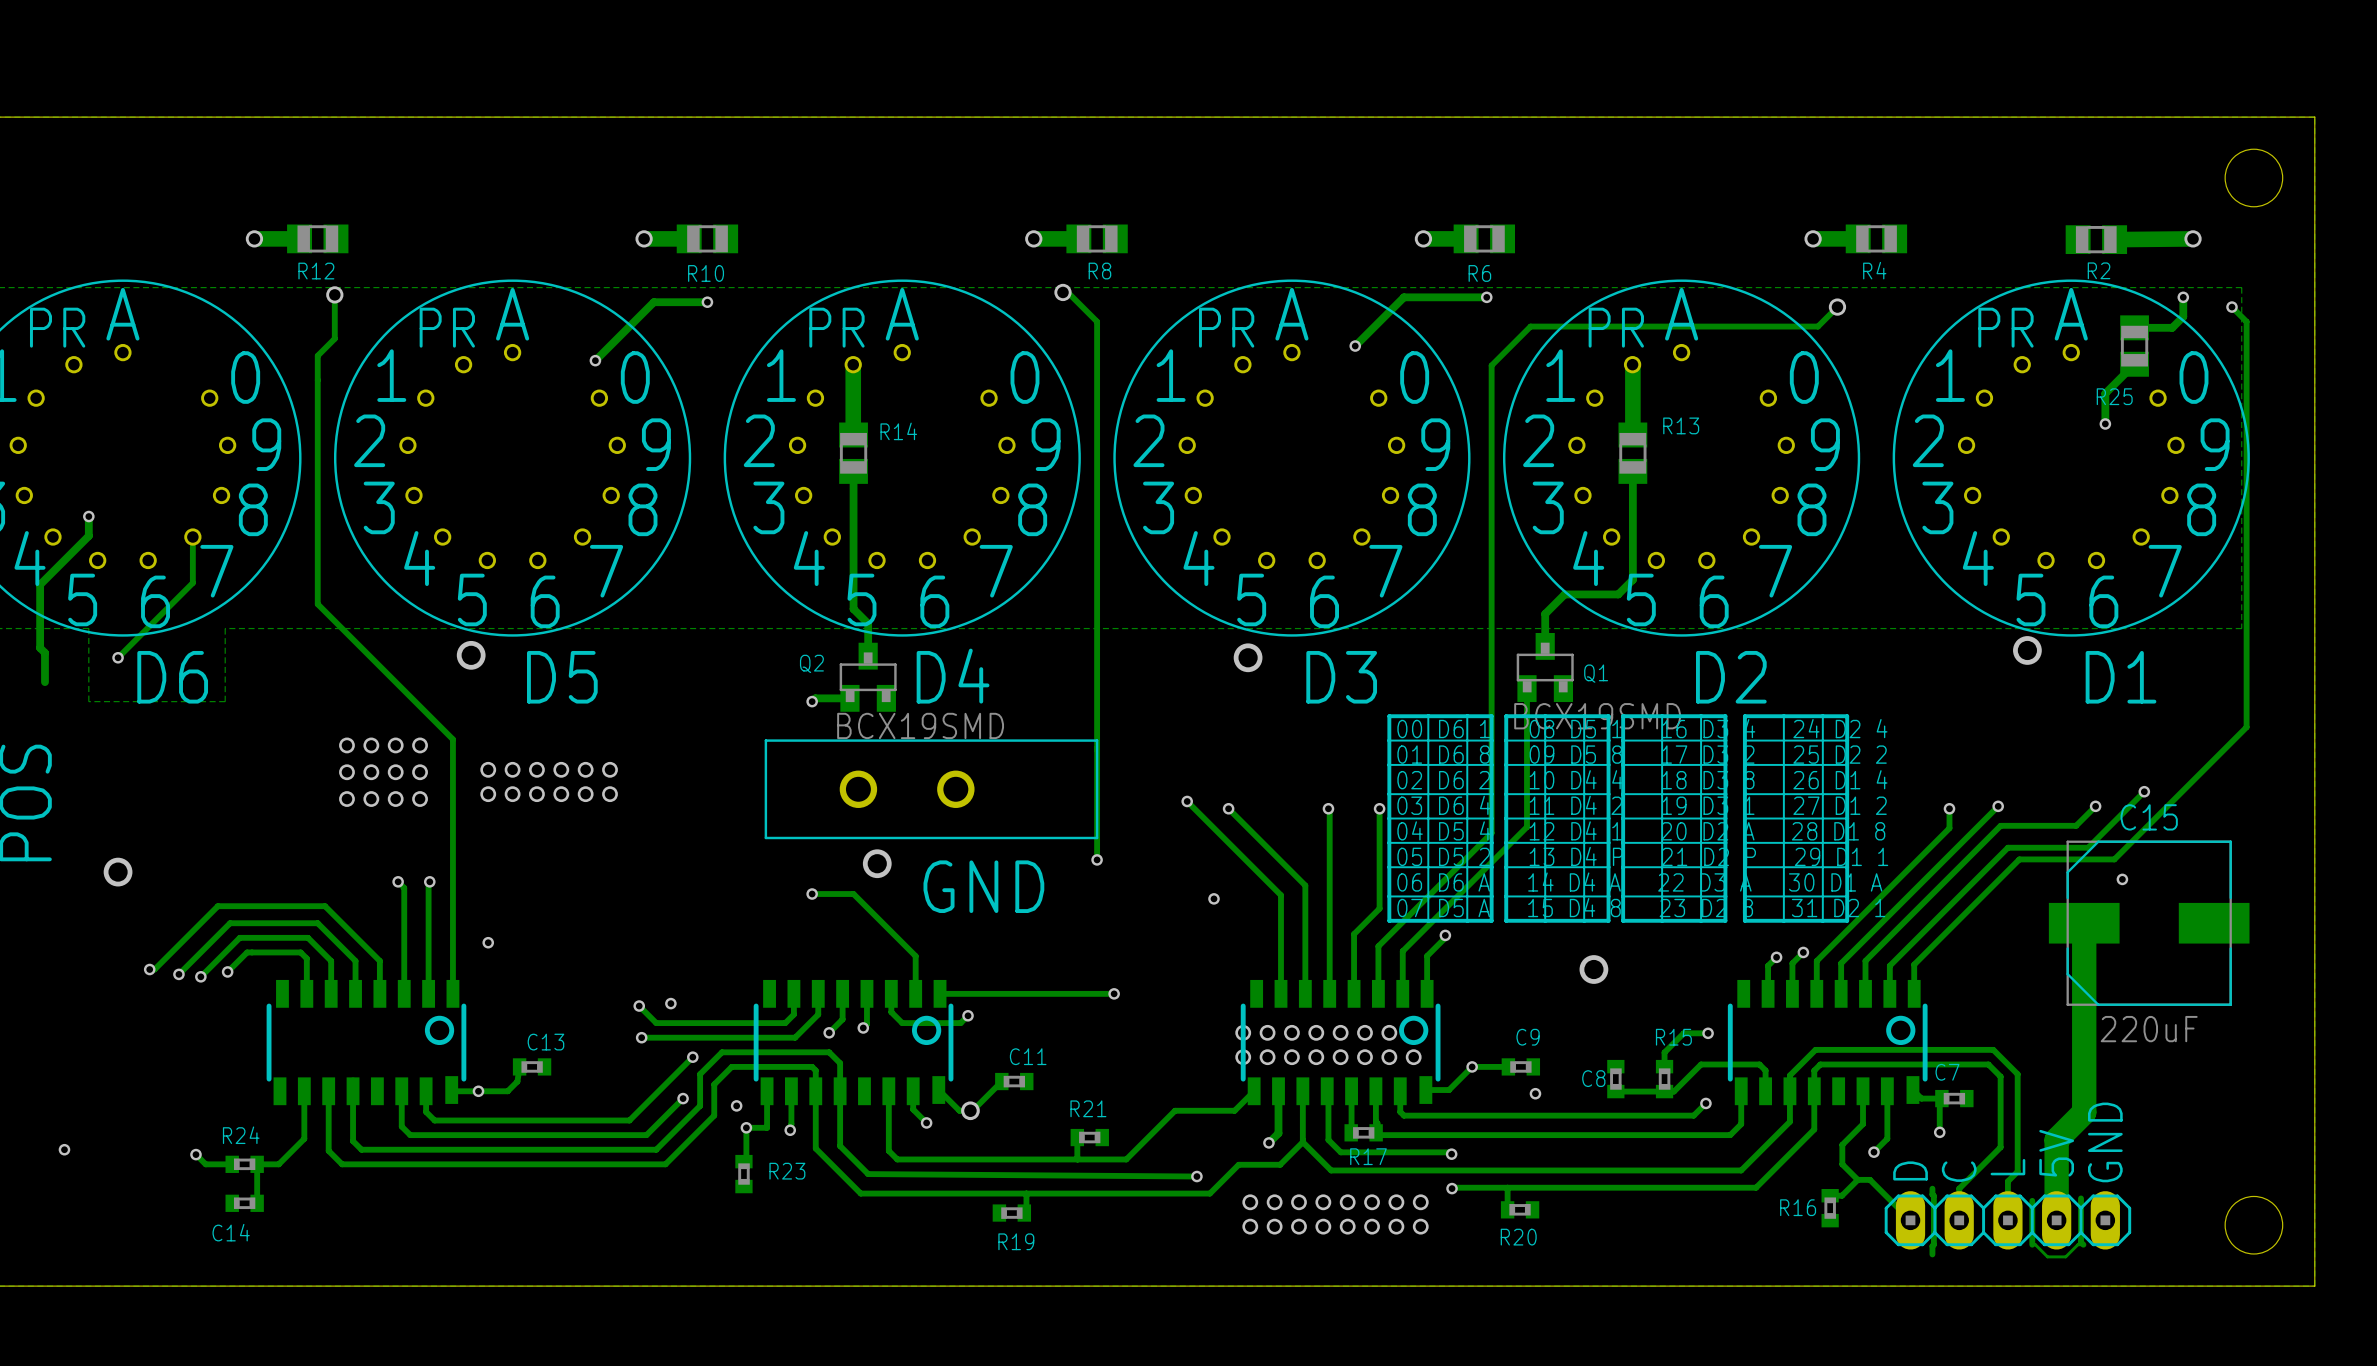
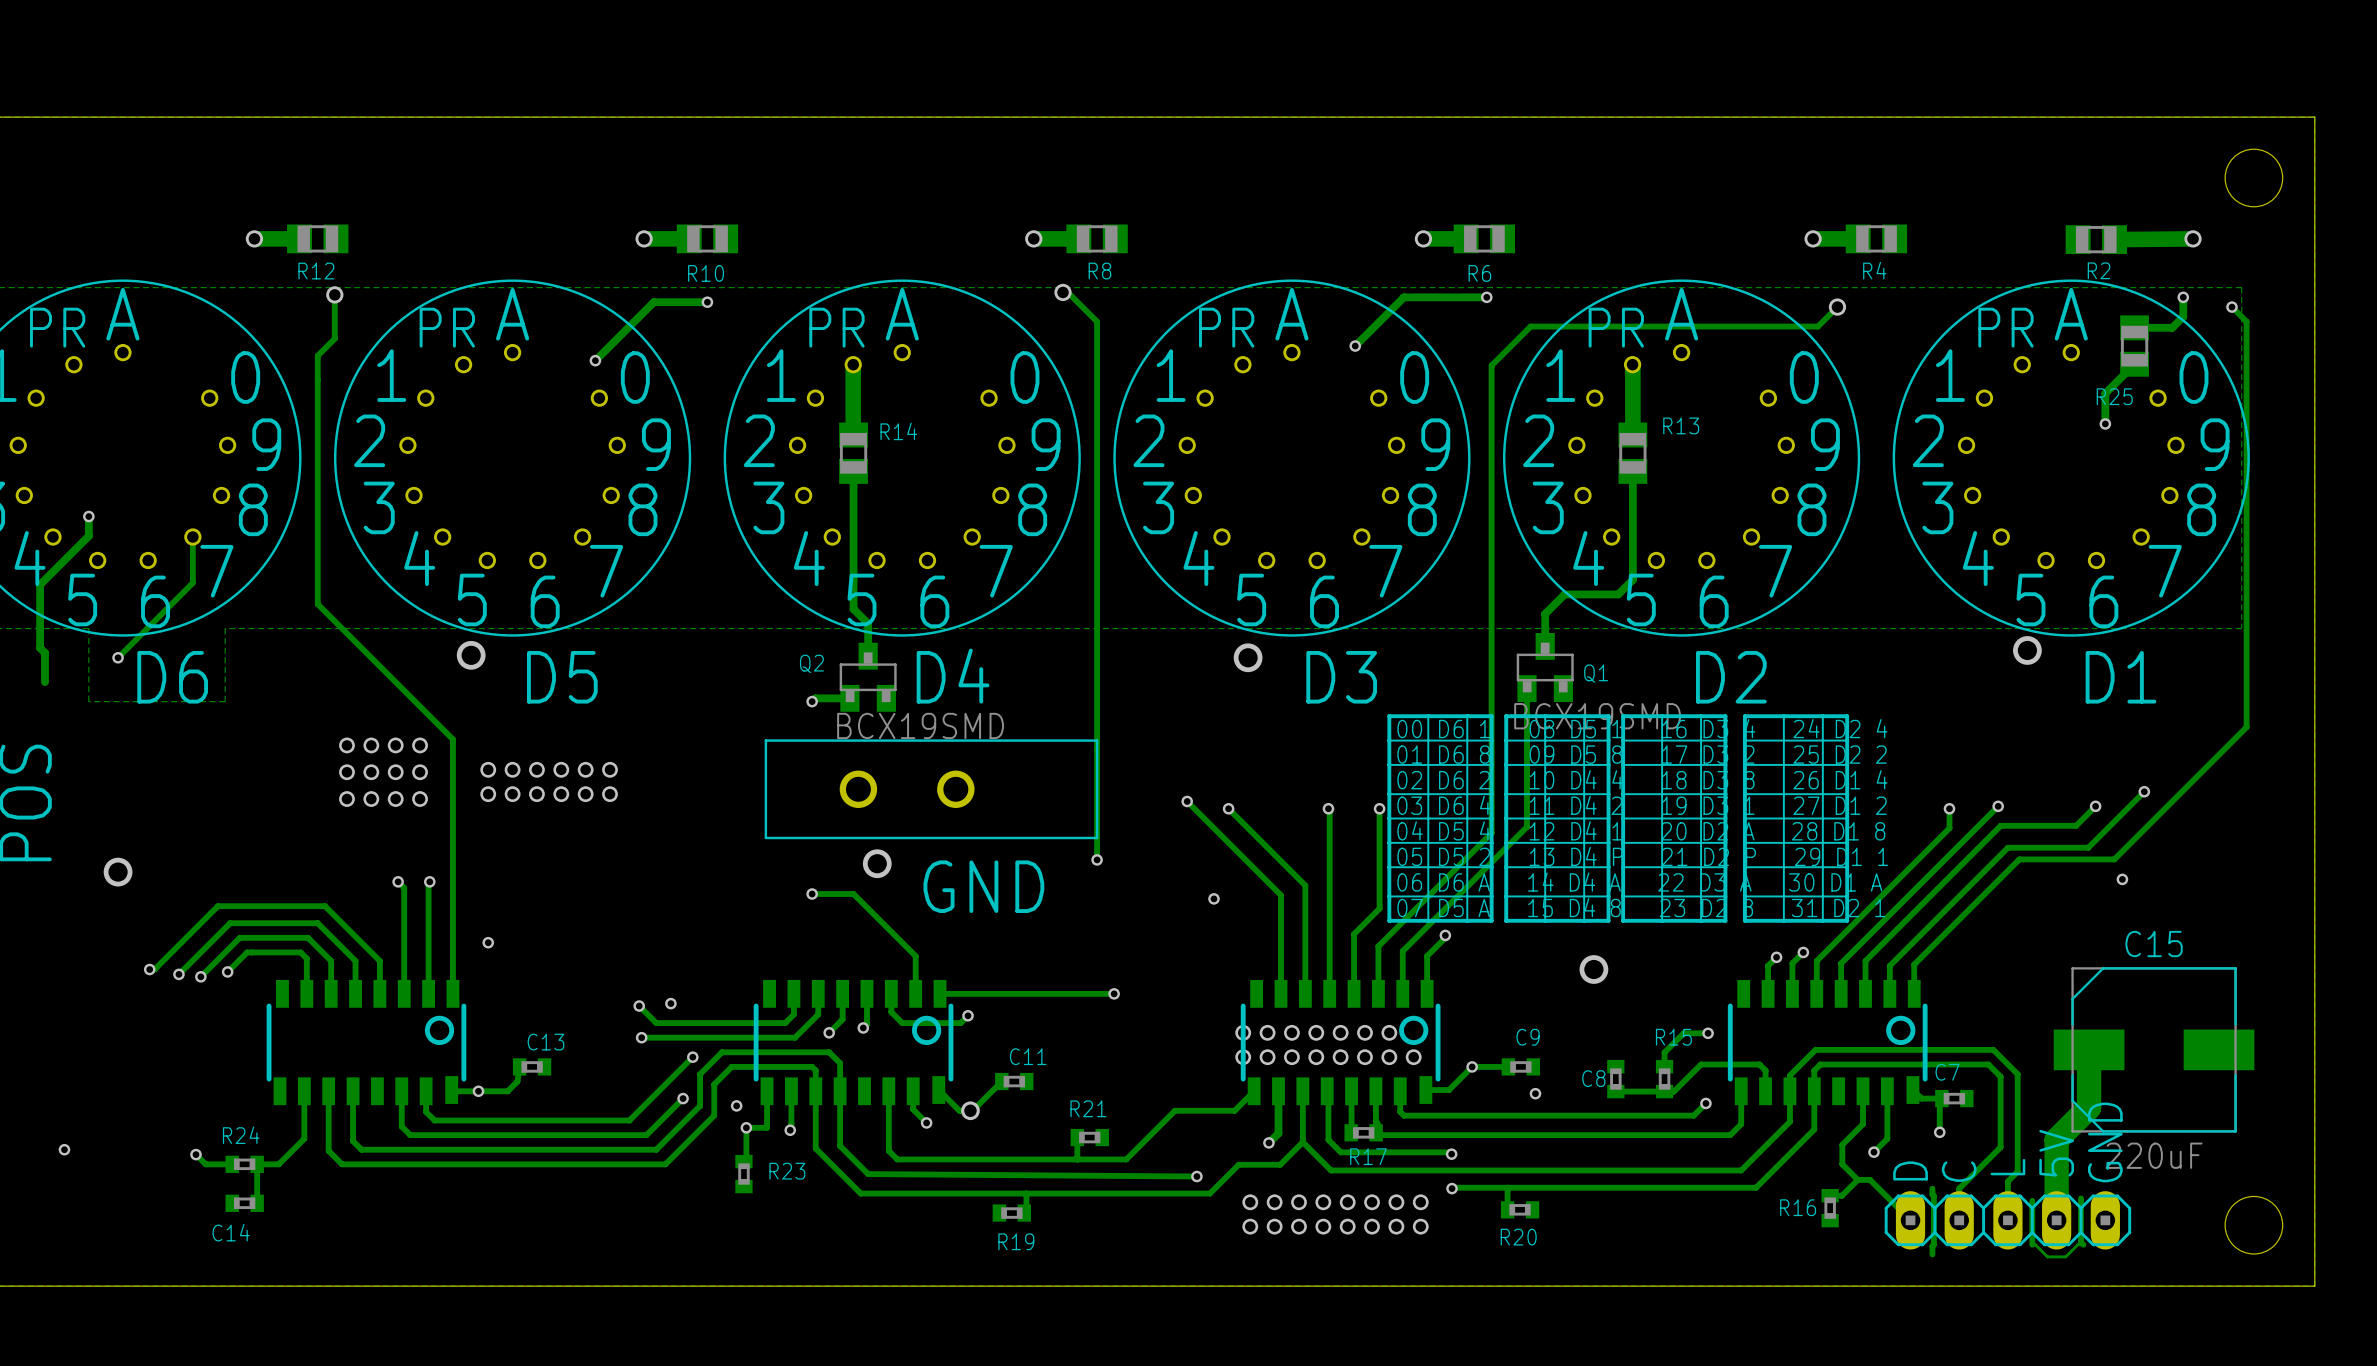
track: (2084, 923) (2084, 1112) -> (2089, 1049) (2089, 1107) (2084, 1112)
C15 position: (2149, 923) -> (2154, 1049)

